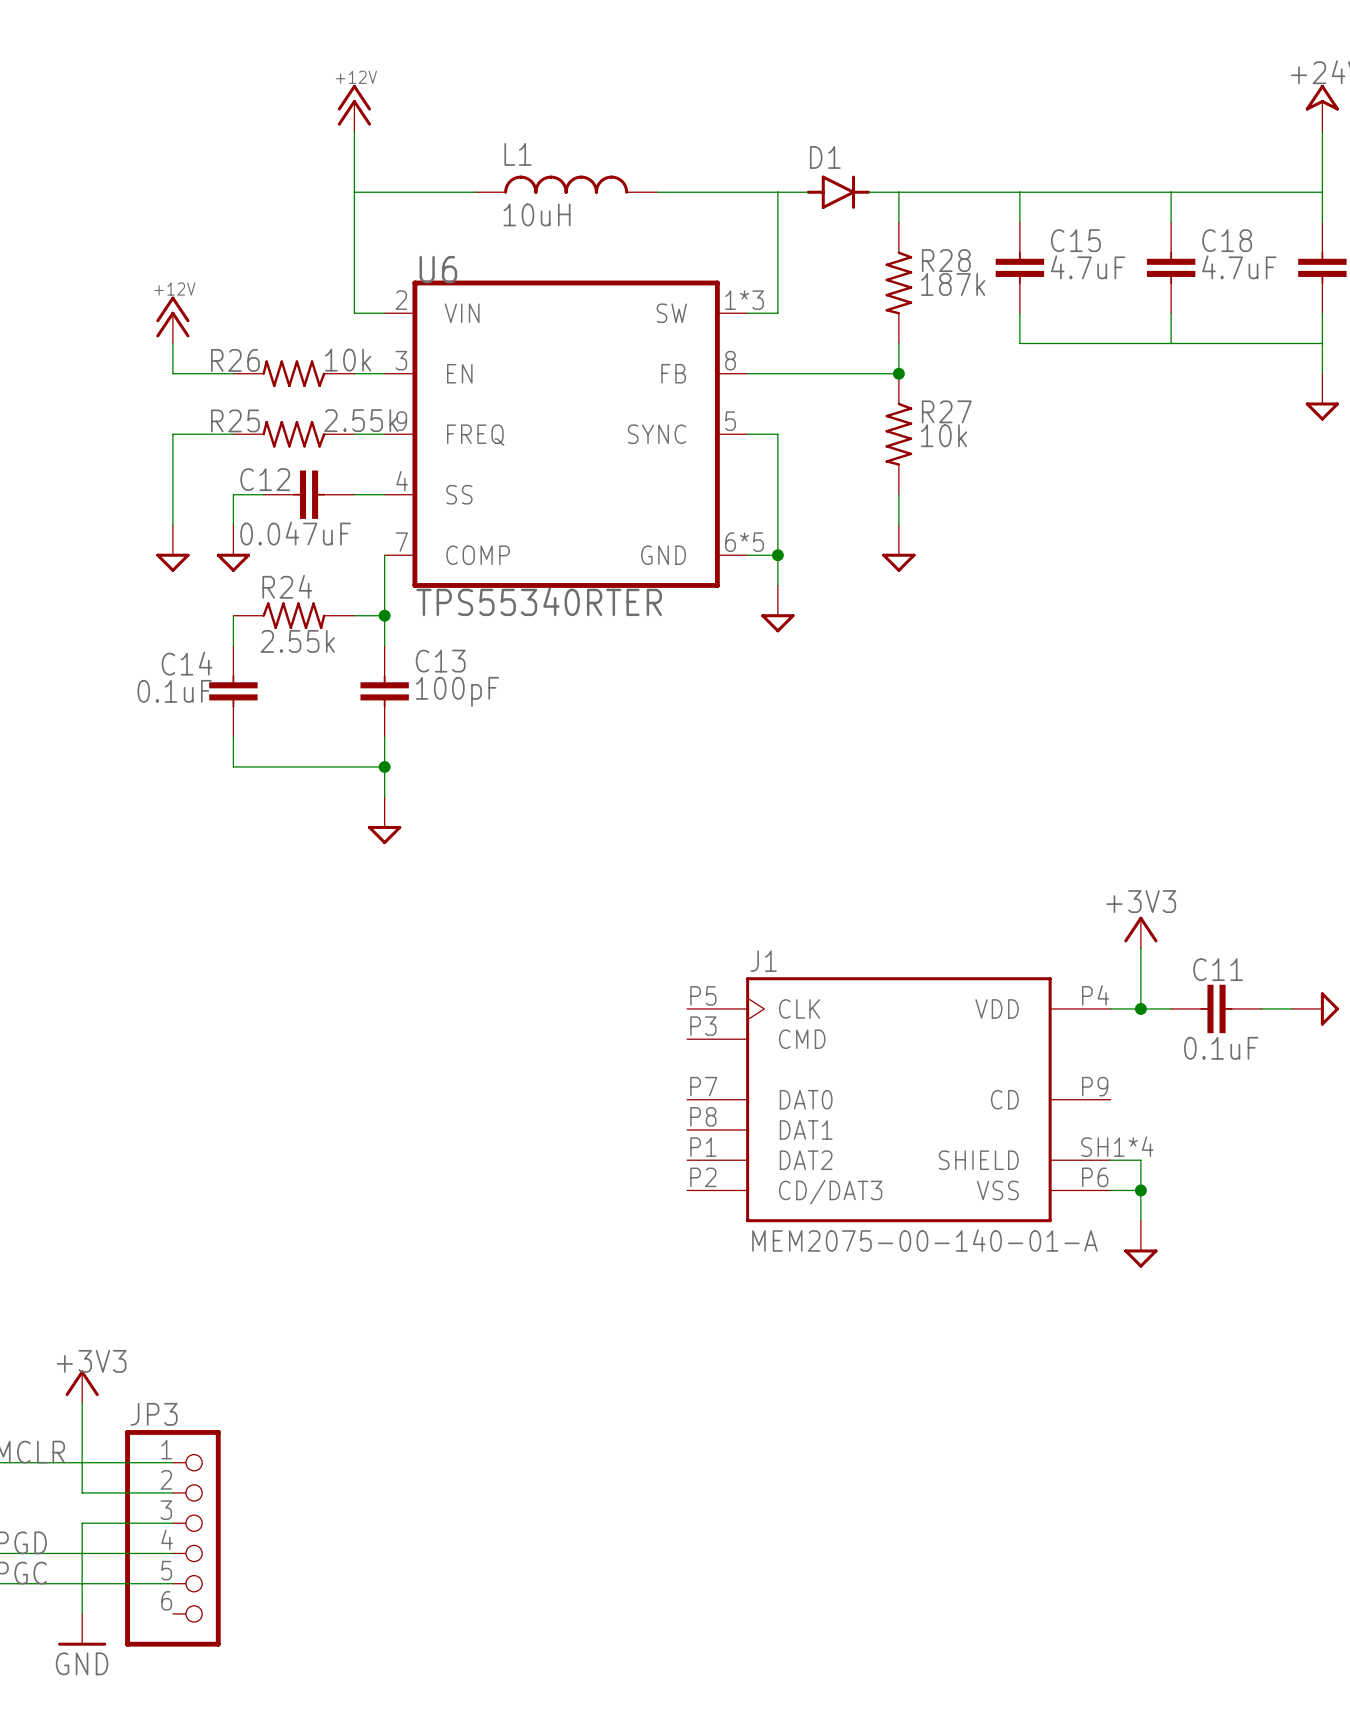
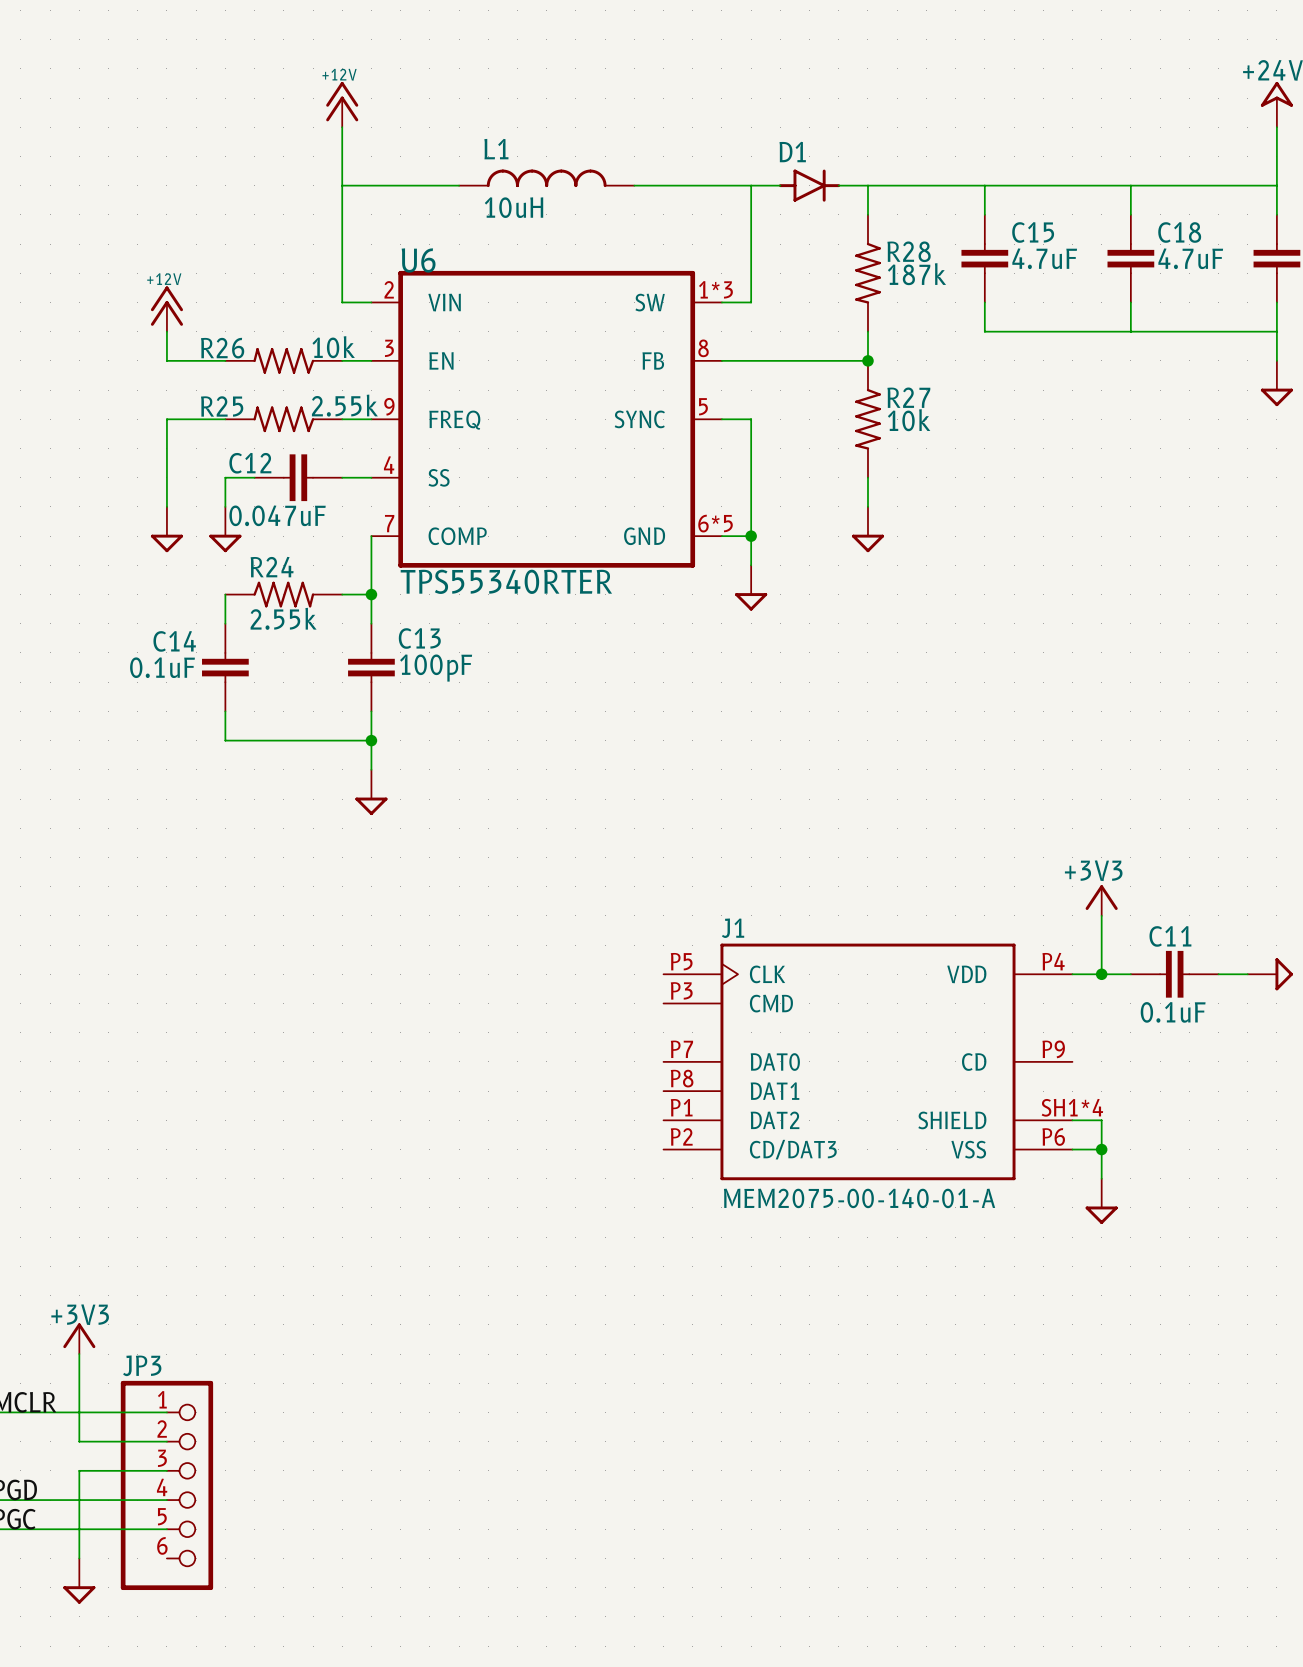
power symbol shape: [57, 1613, 107, 1646] -> [63, 1558, 96, 1604]
power symbol text: GND (82, 1663) -> none

